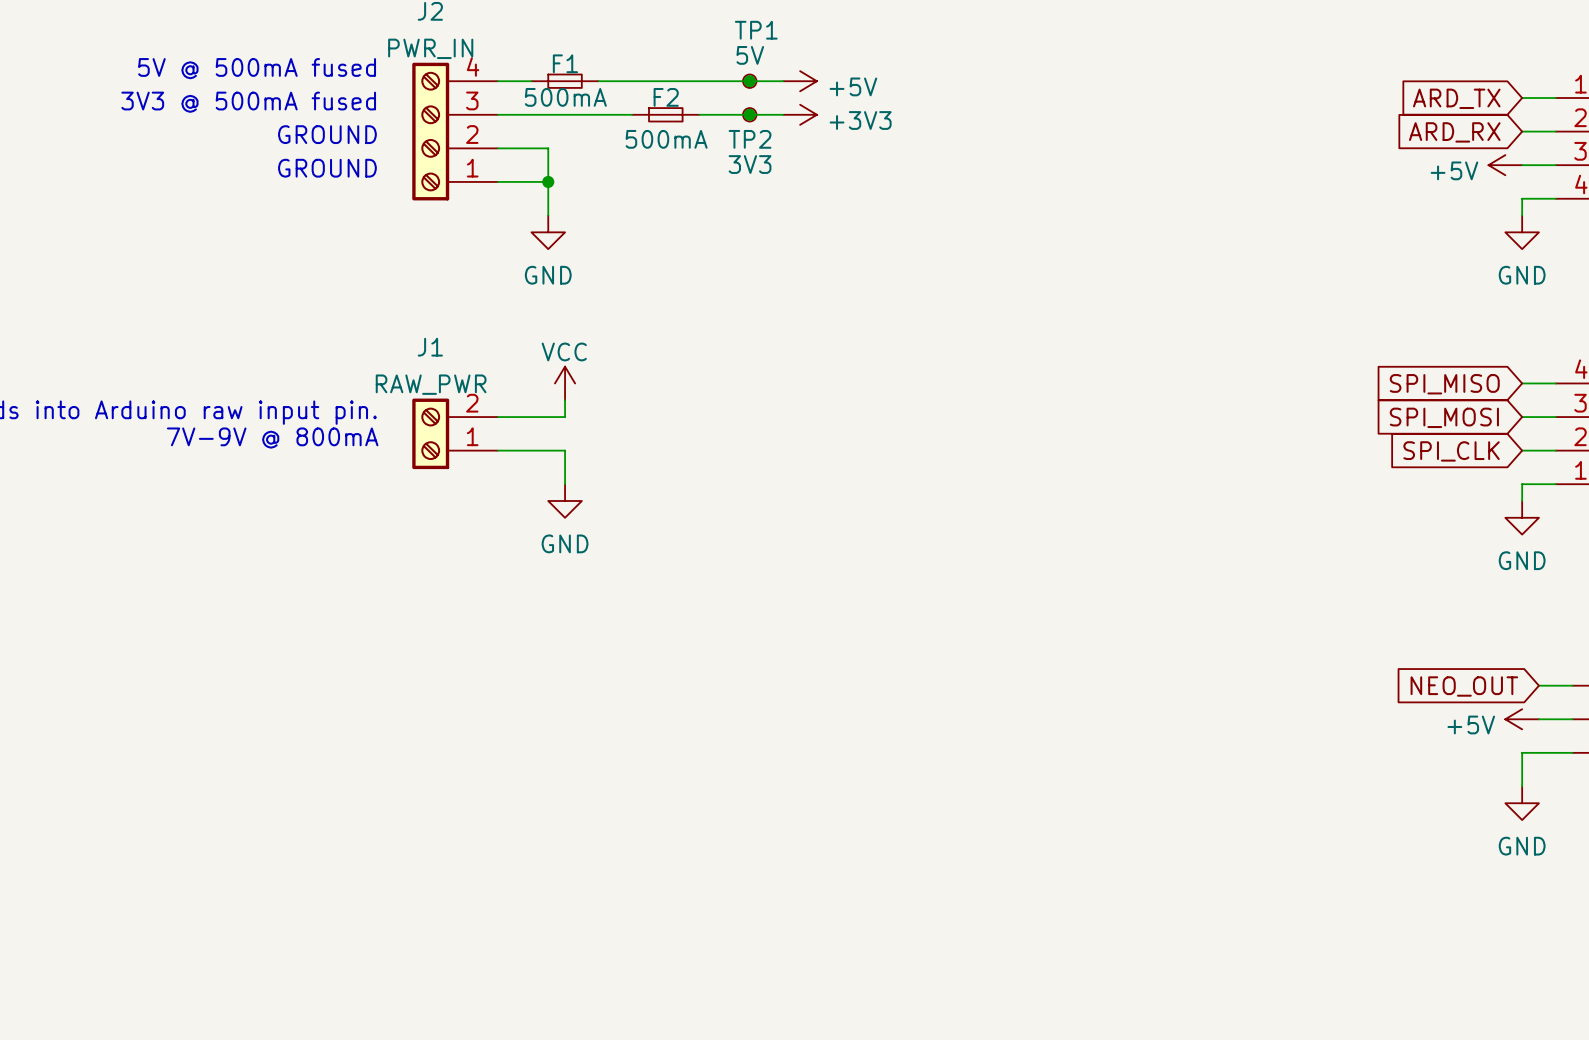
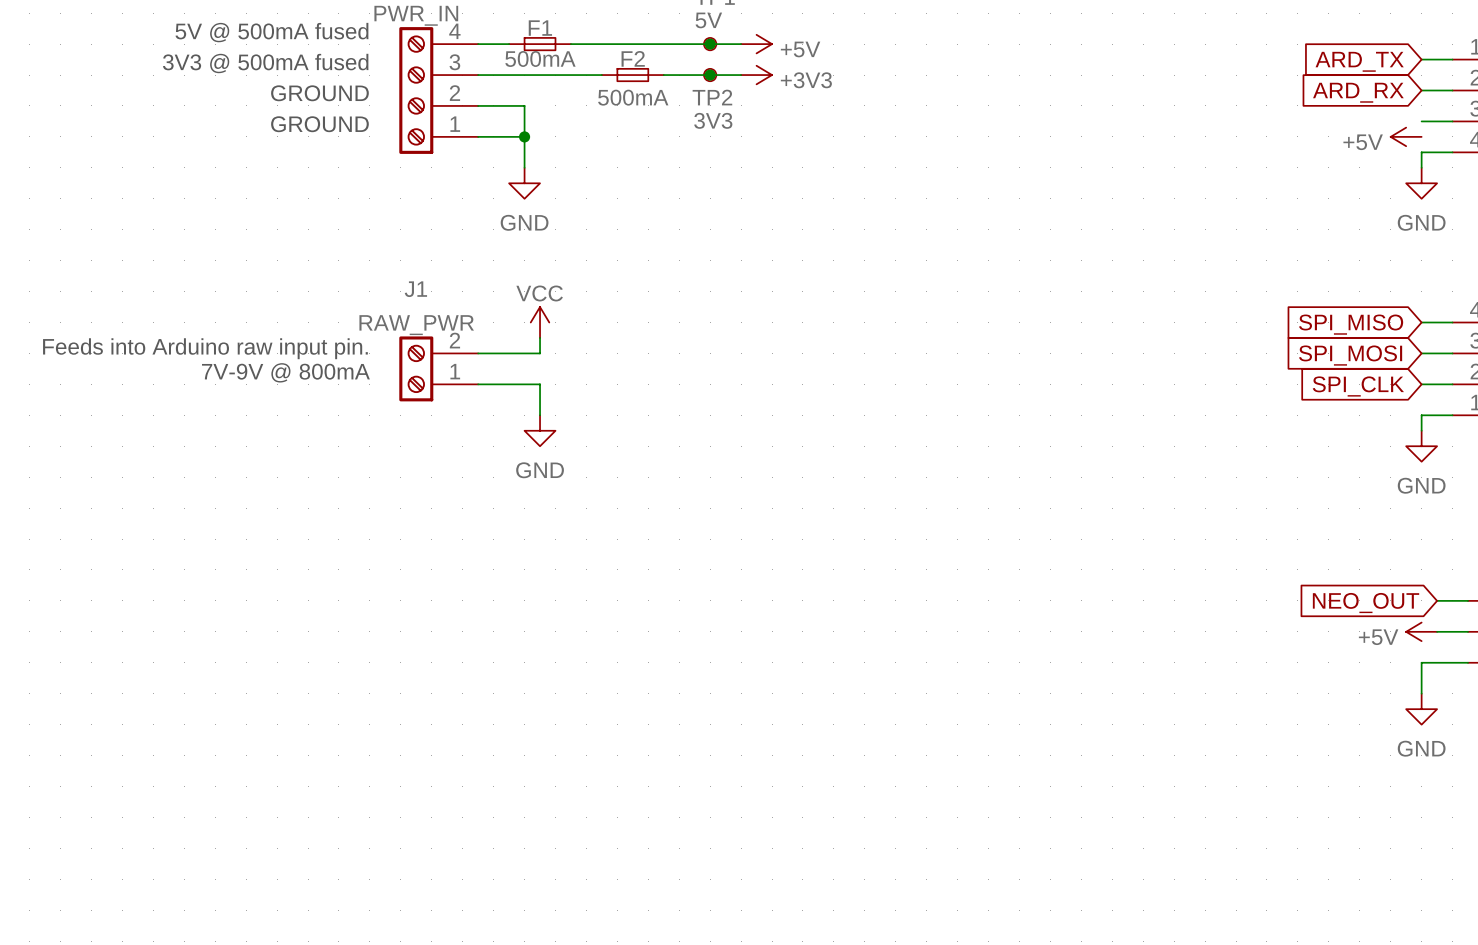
power symbol position: +5V (1505, 165) -> +5V (1406, 136)

